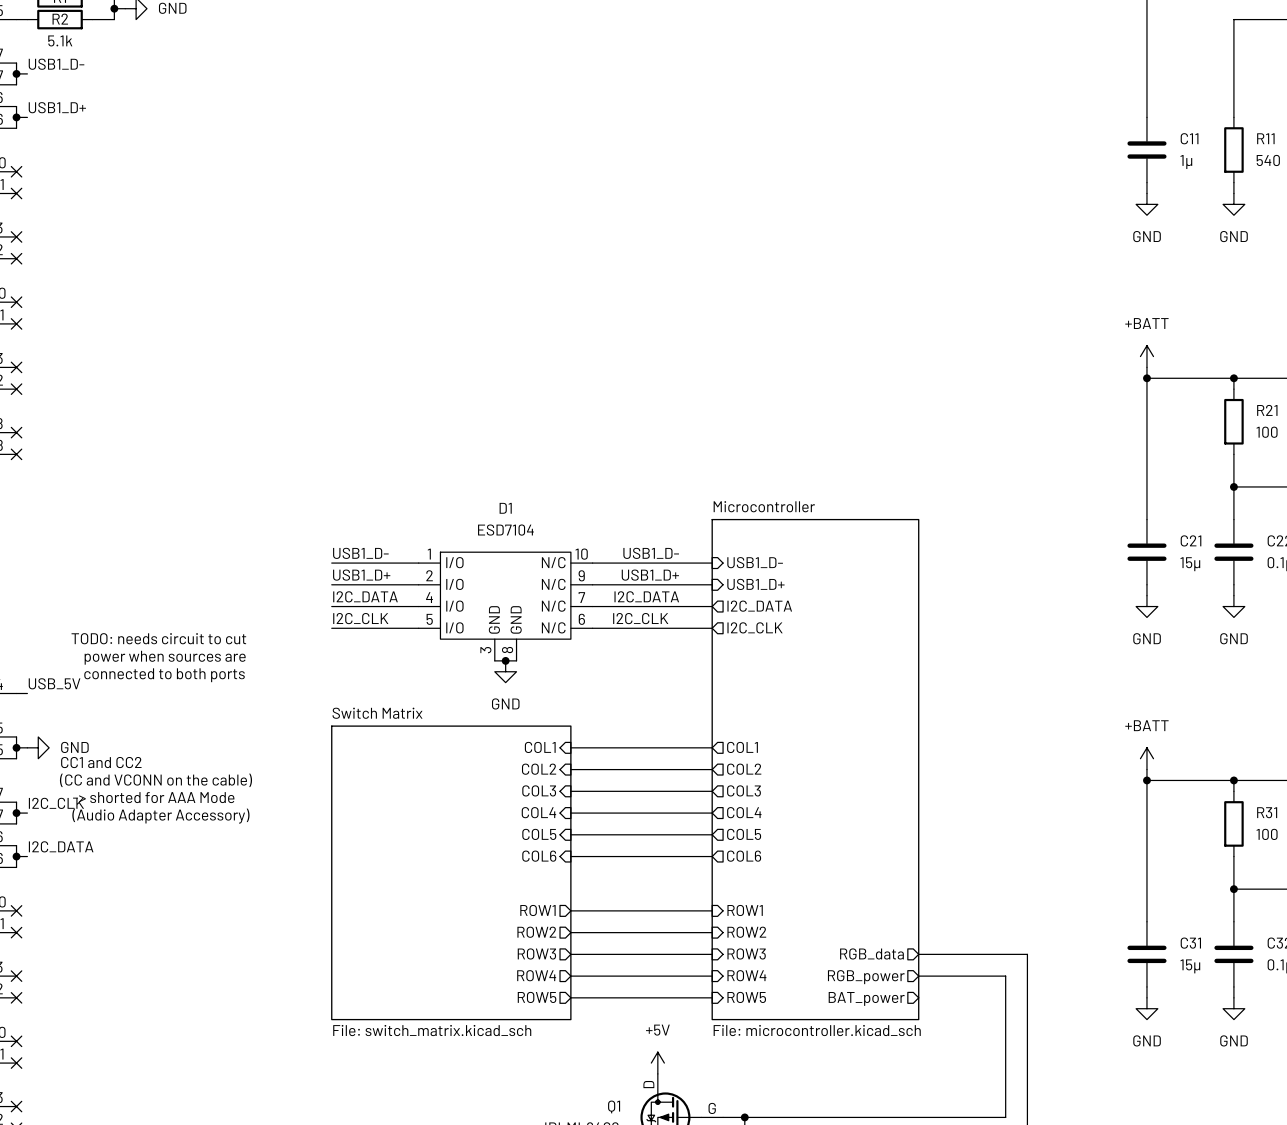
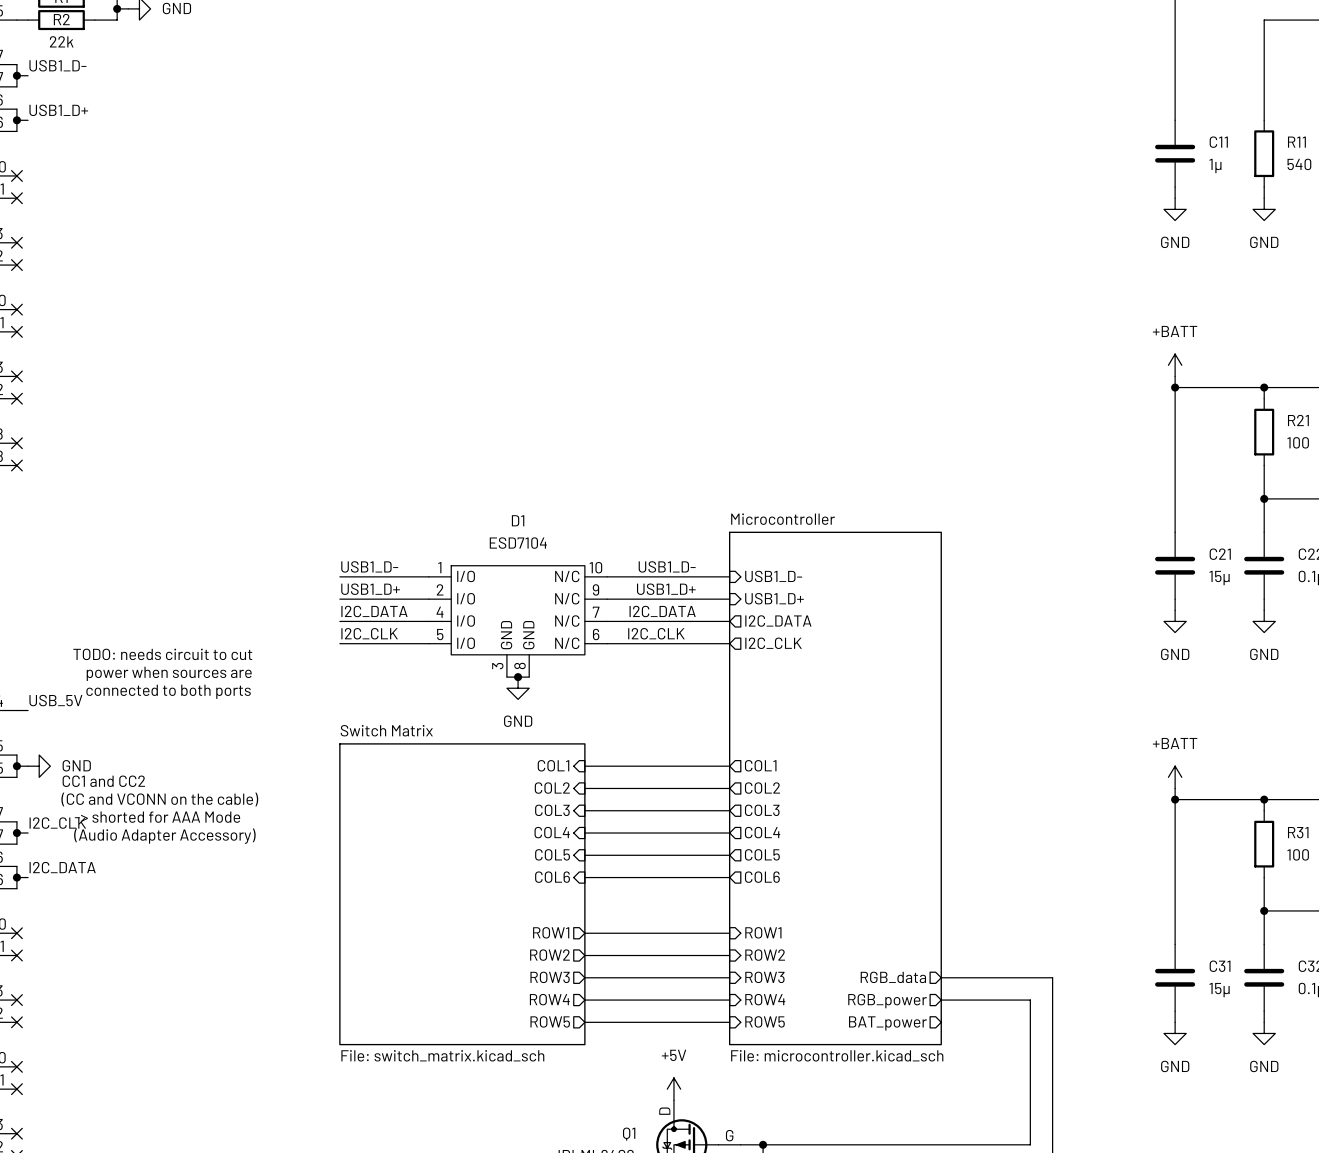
R2 value: 5.1k (60, 40) -> 22k (61, 41)

